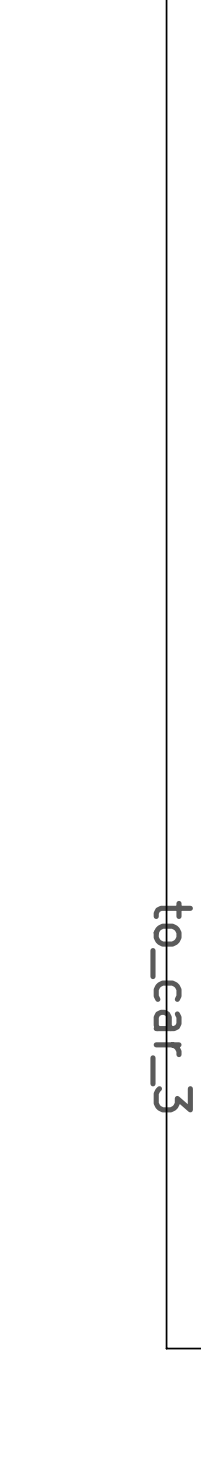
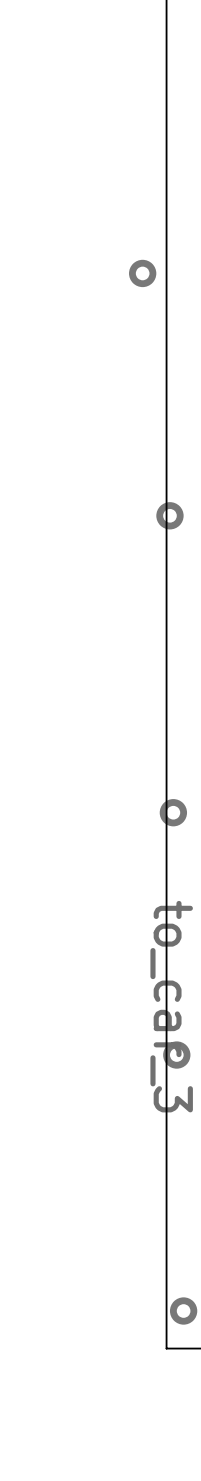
via: none -> (142, 273)
via: none -> (169, 515)
via: none -> (173, 812)
via: none -> (176, 1055)
via: none -> (183, 1311)

